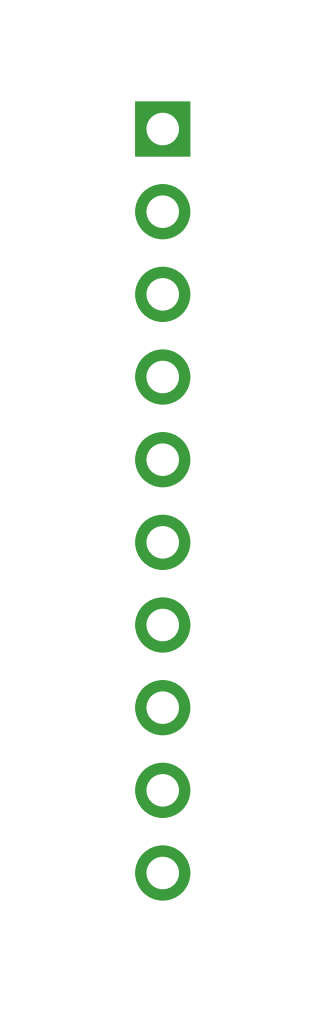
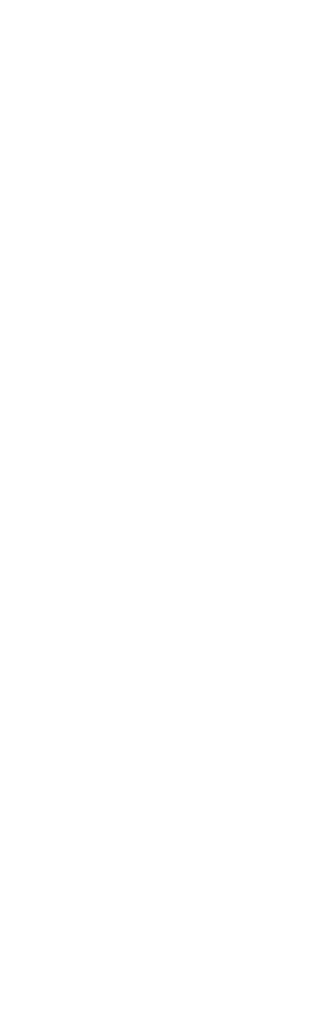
part: (162, 501) -> none

